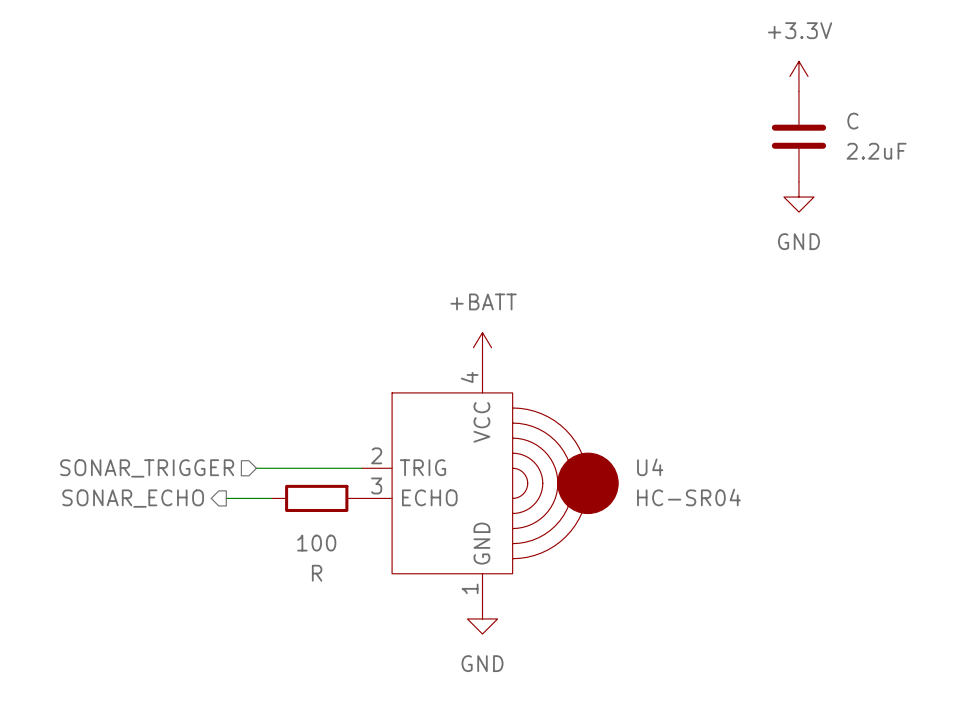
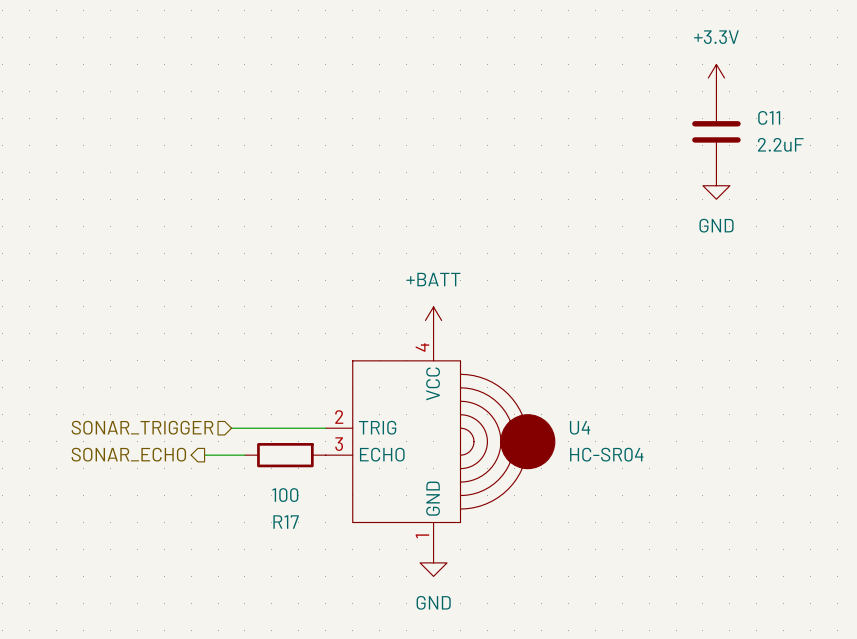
C name: C (852, 121) -> C11 (769, 117)
R name: R (317, 573) -> R17 (286, 521)

